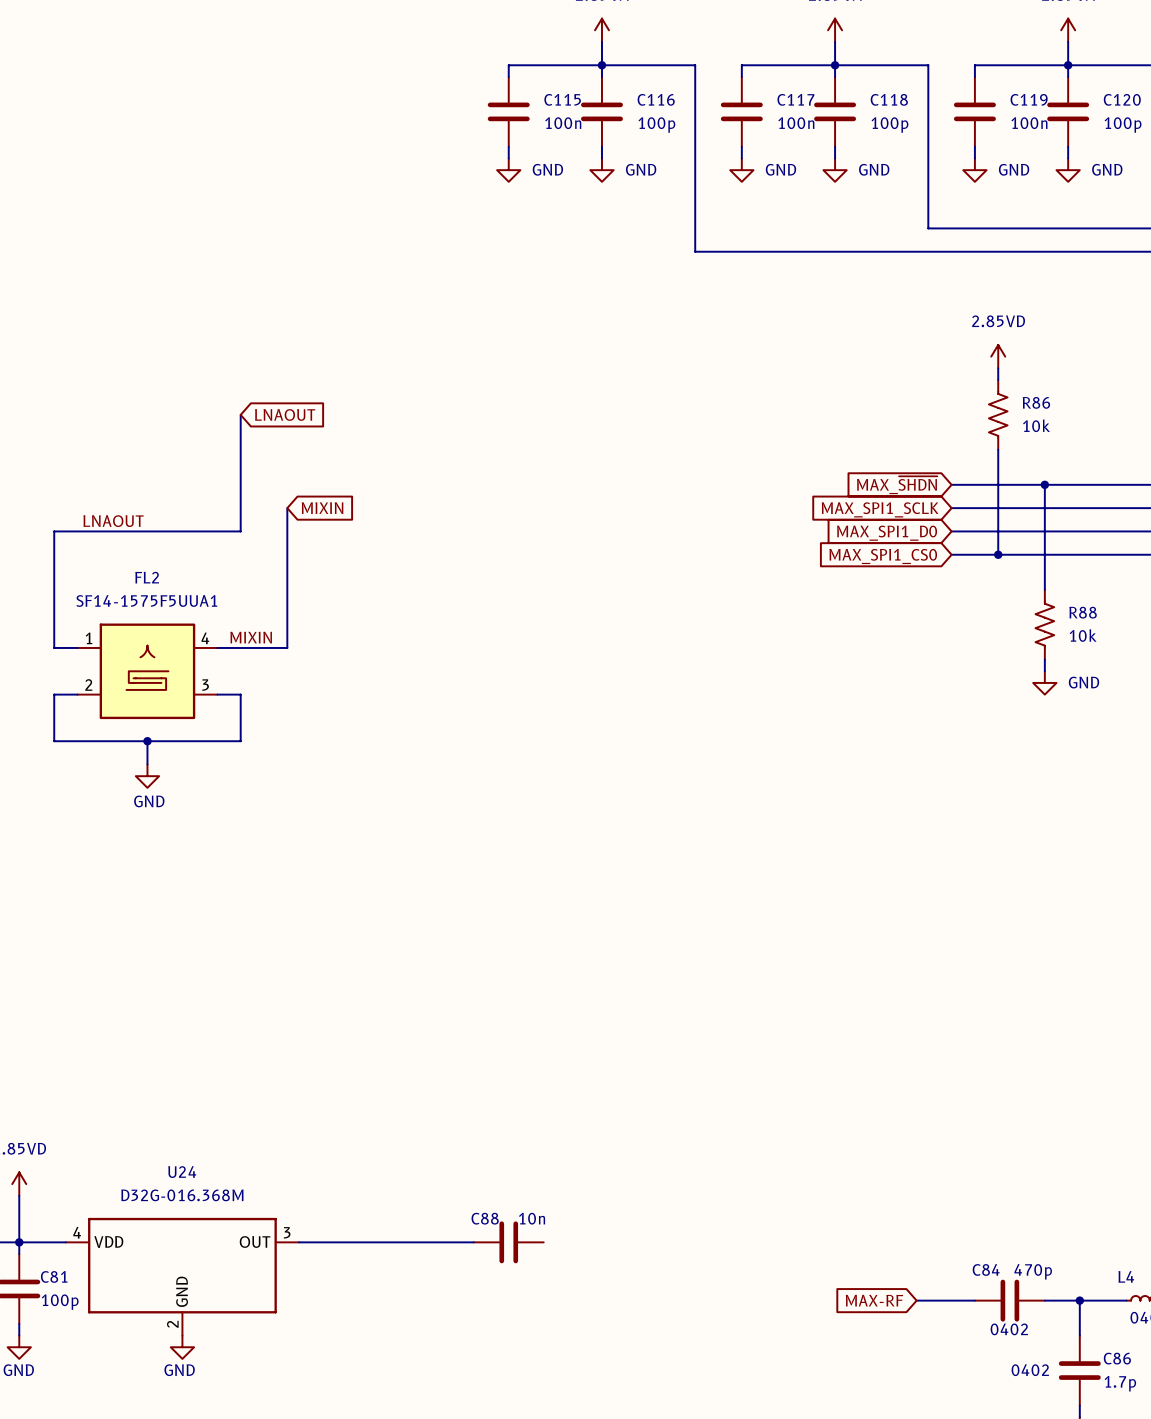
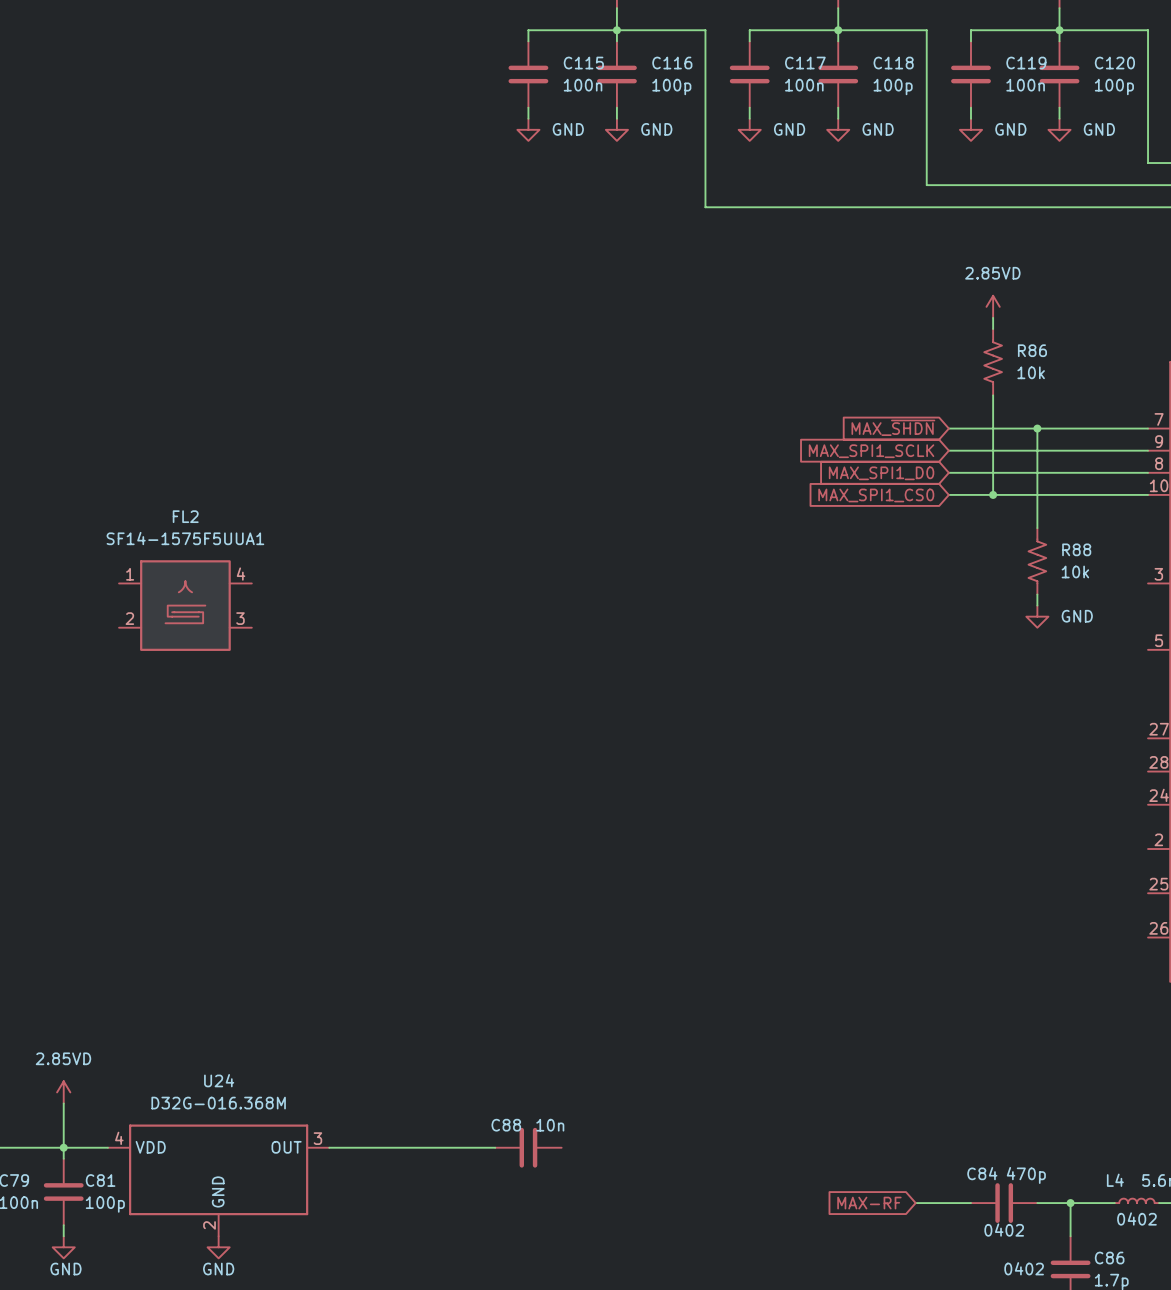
wire: (240, 414) (240, 531) (54, 531) (54, 647) (77, 647) -> none
global label: LNAOUT (285, 414) -> none
wire: (287, 508) (287, 647) (217, 647) -> none
global label: MIXIN (322, 508) -> none
label: LNAOUT (113, 521) -> none
label: MIXIN (251, 637) -> none
wire: (77, 694) (54, 694) (54, 741) (240, 741) (240, 694) (217, 694) -> none
wire: (147, 741) (147, 764) -> none
junction: (147, 741) -> none
power symbol: GND (147, 776) -> none

